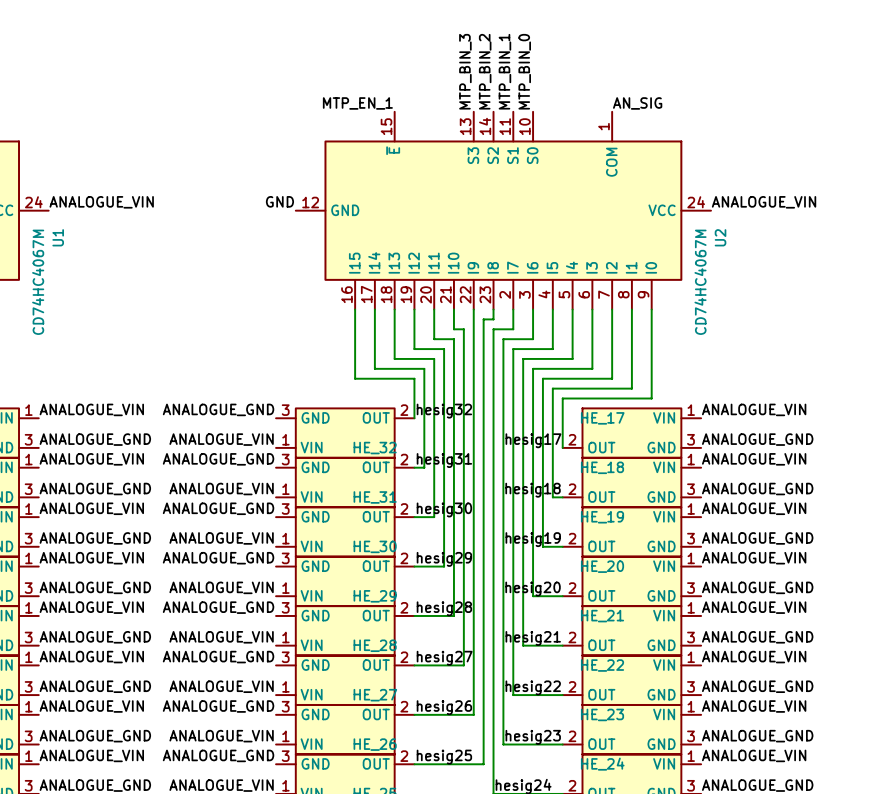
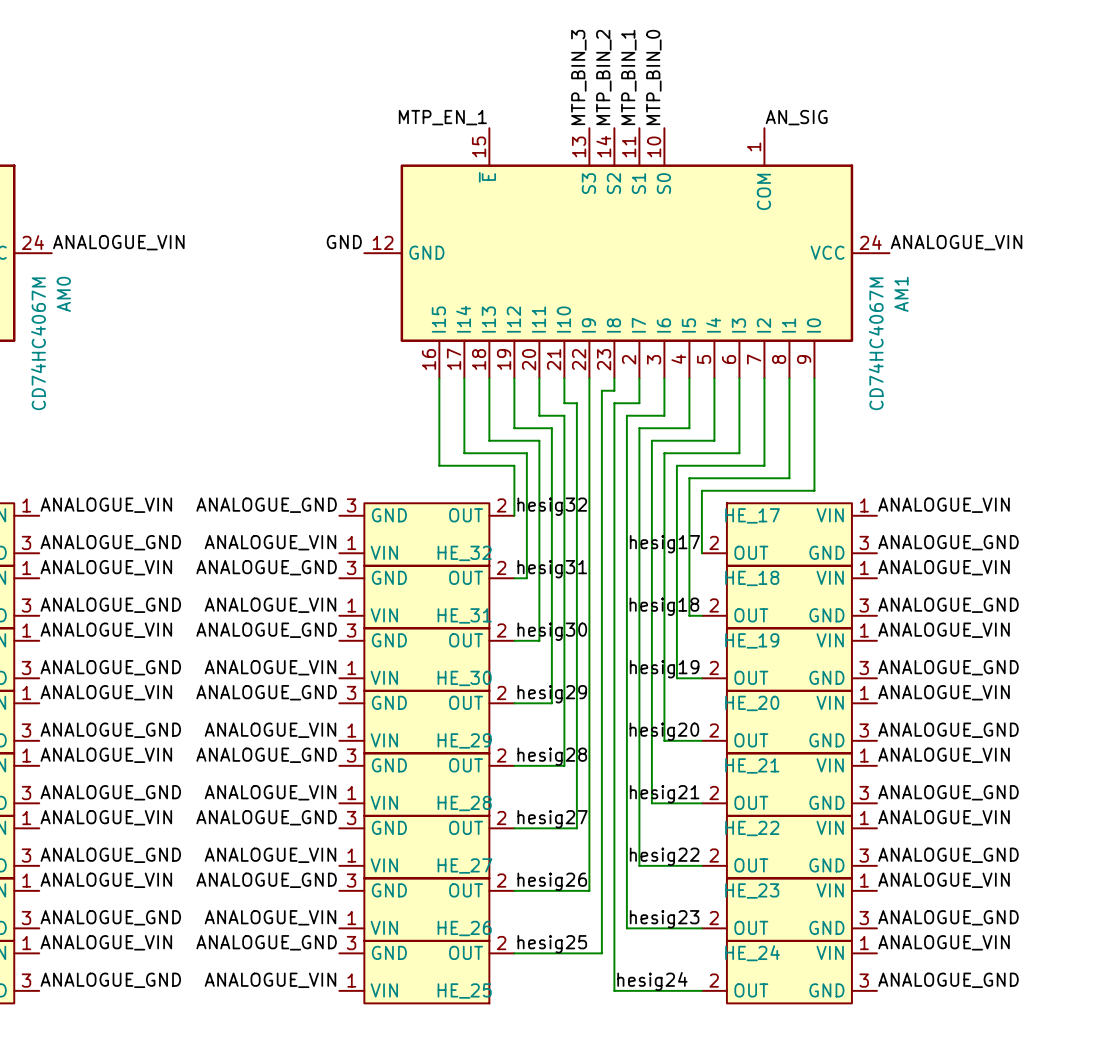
U1 name: U1 (58, 237) -> AM0 (63, 294)
U2 name: U2 (720, 237) -> AM1 (901, 294)

